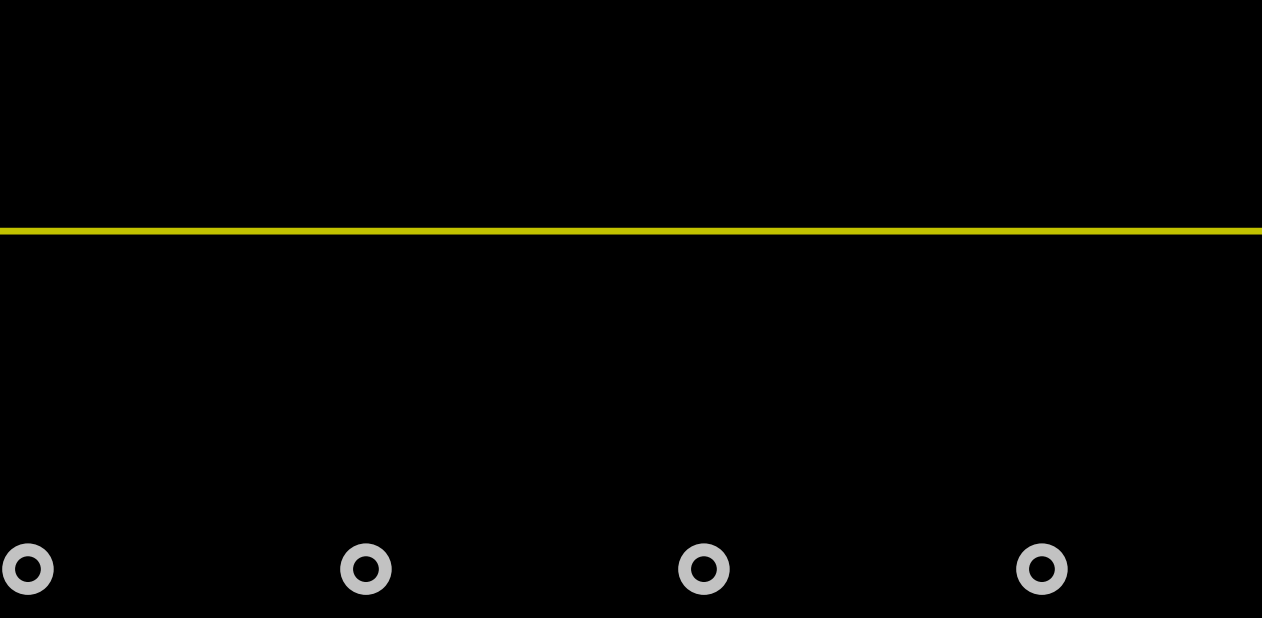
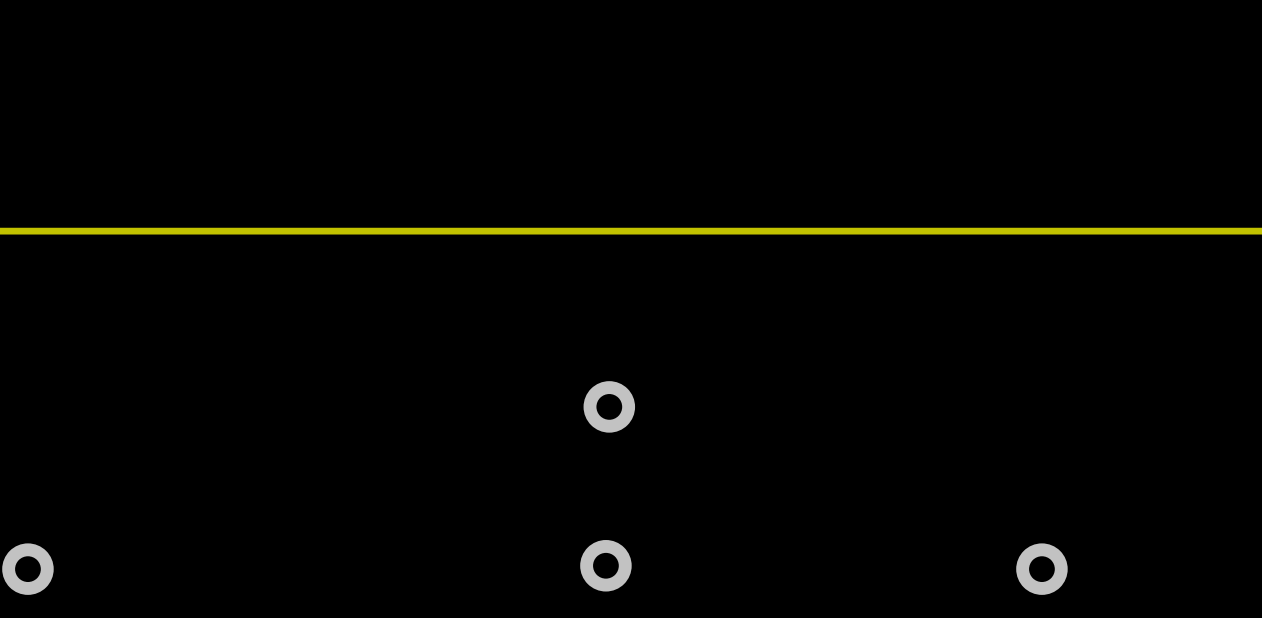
via: none -> (609, 406)
via: none -> (605, 565)
via: (365, 569) -> none
via: (703, 569) -> none

